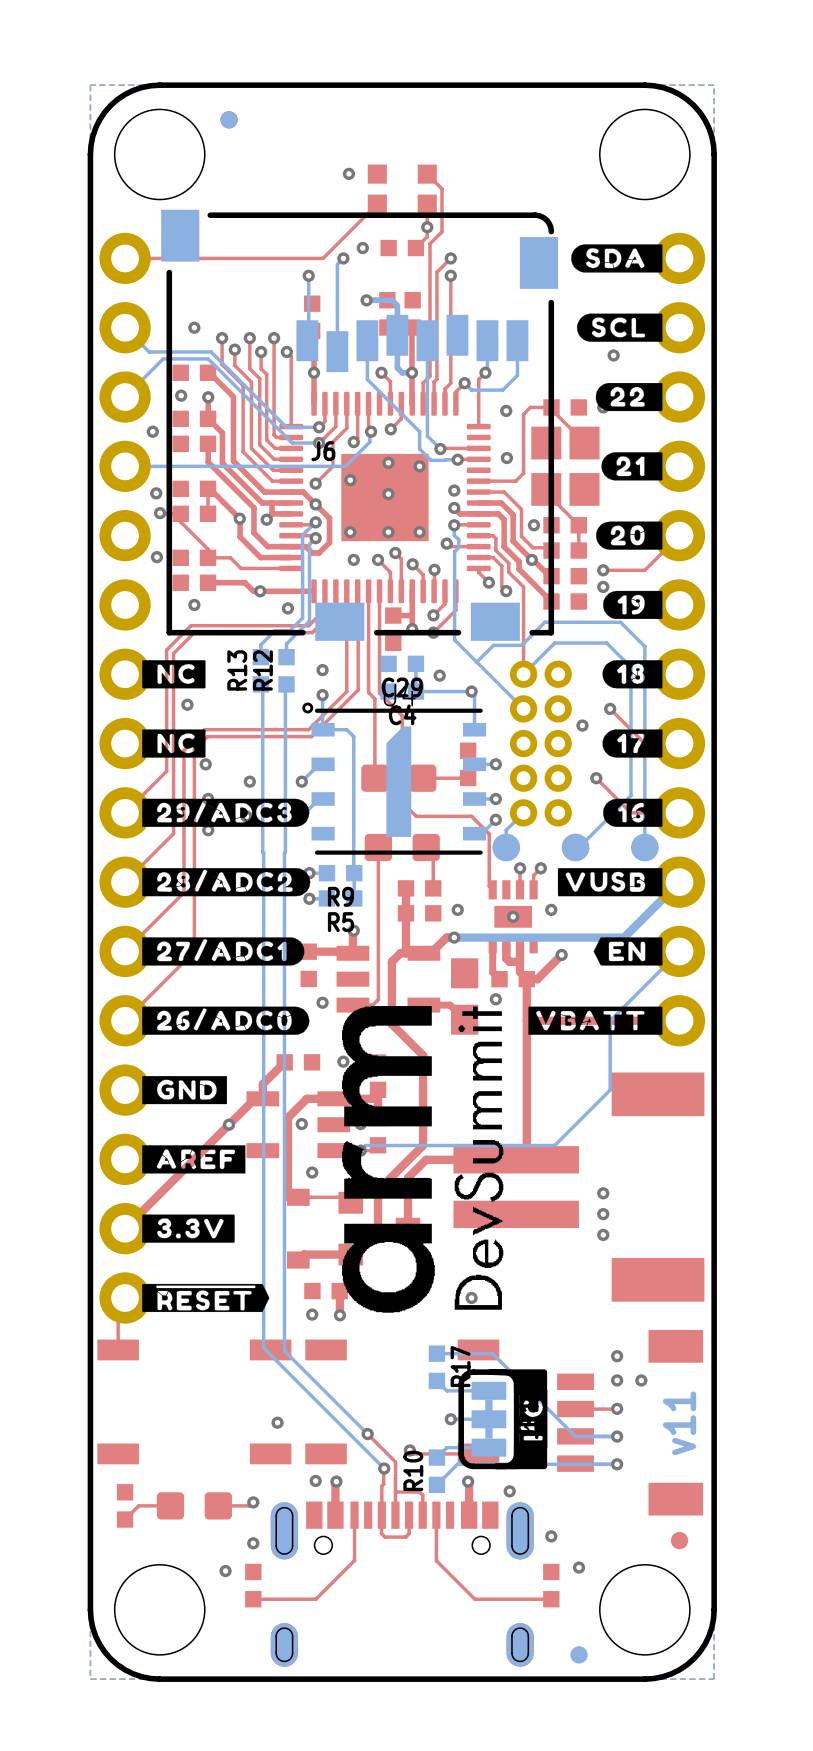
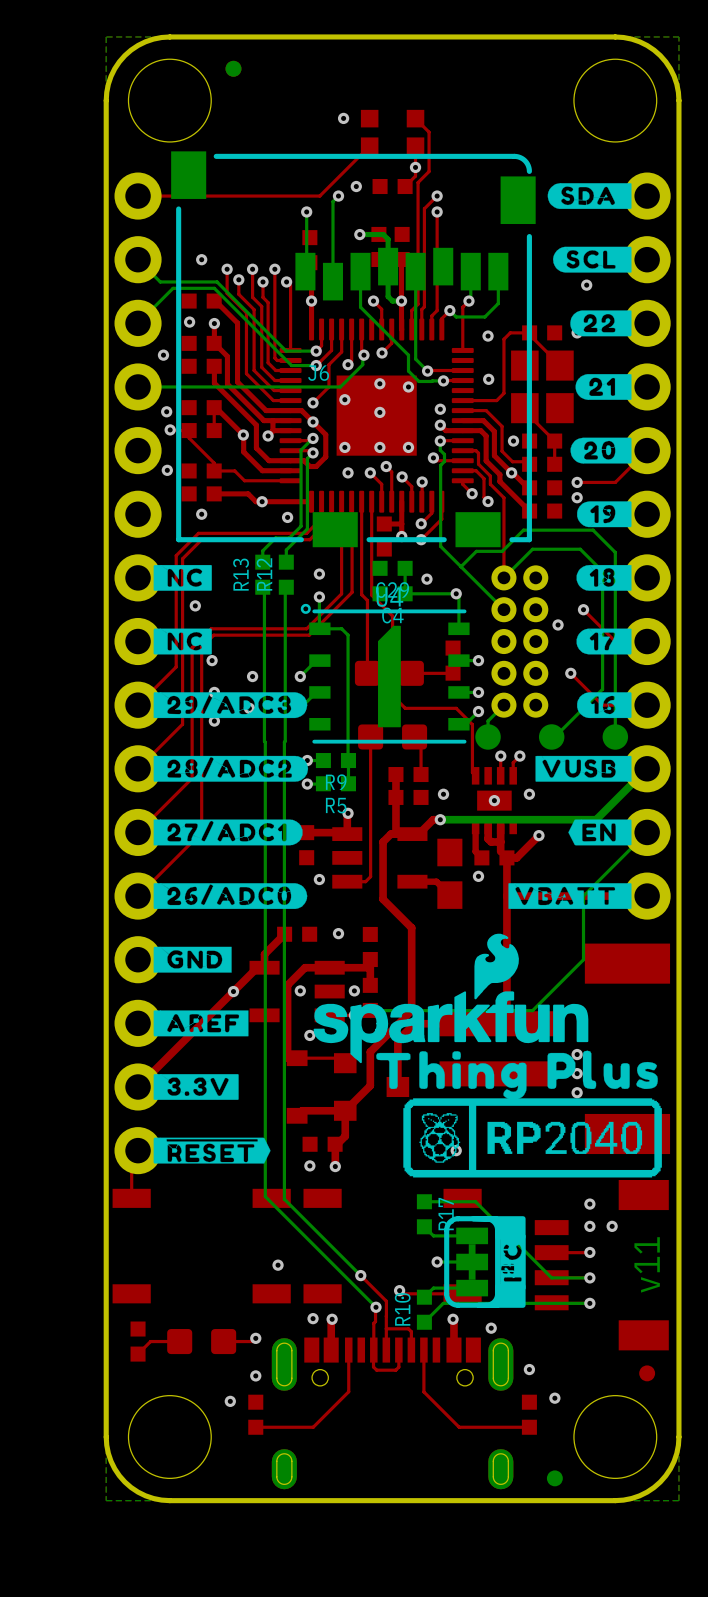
drawing: [342, 1006, 504, 1313] -> none
drawing: none -> [313, 933, 662, 1178]

